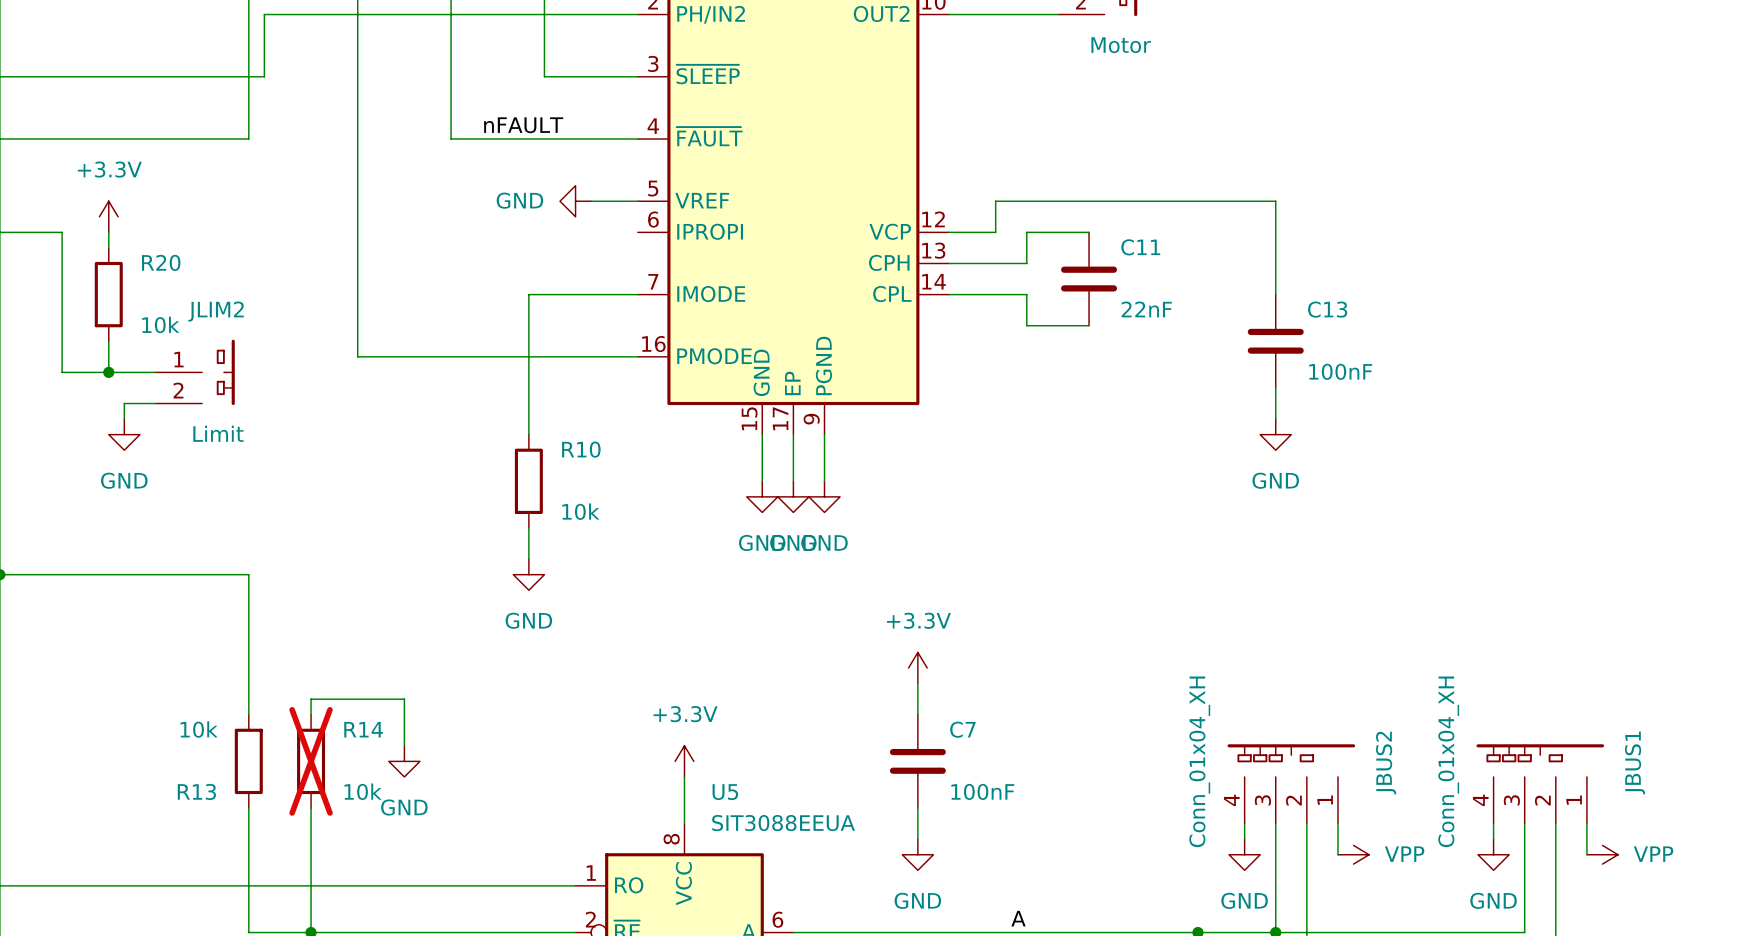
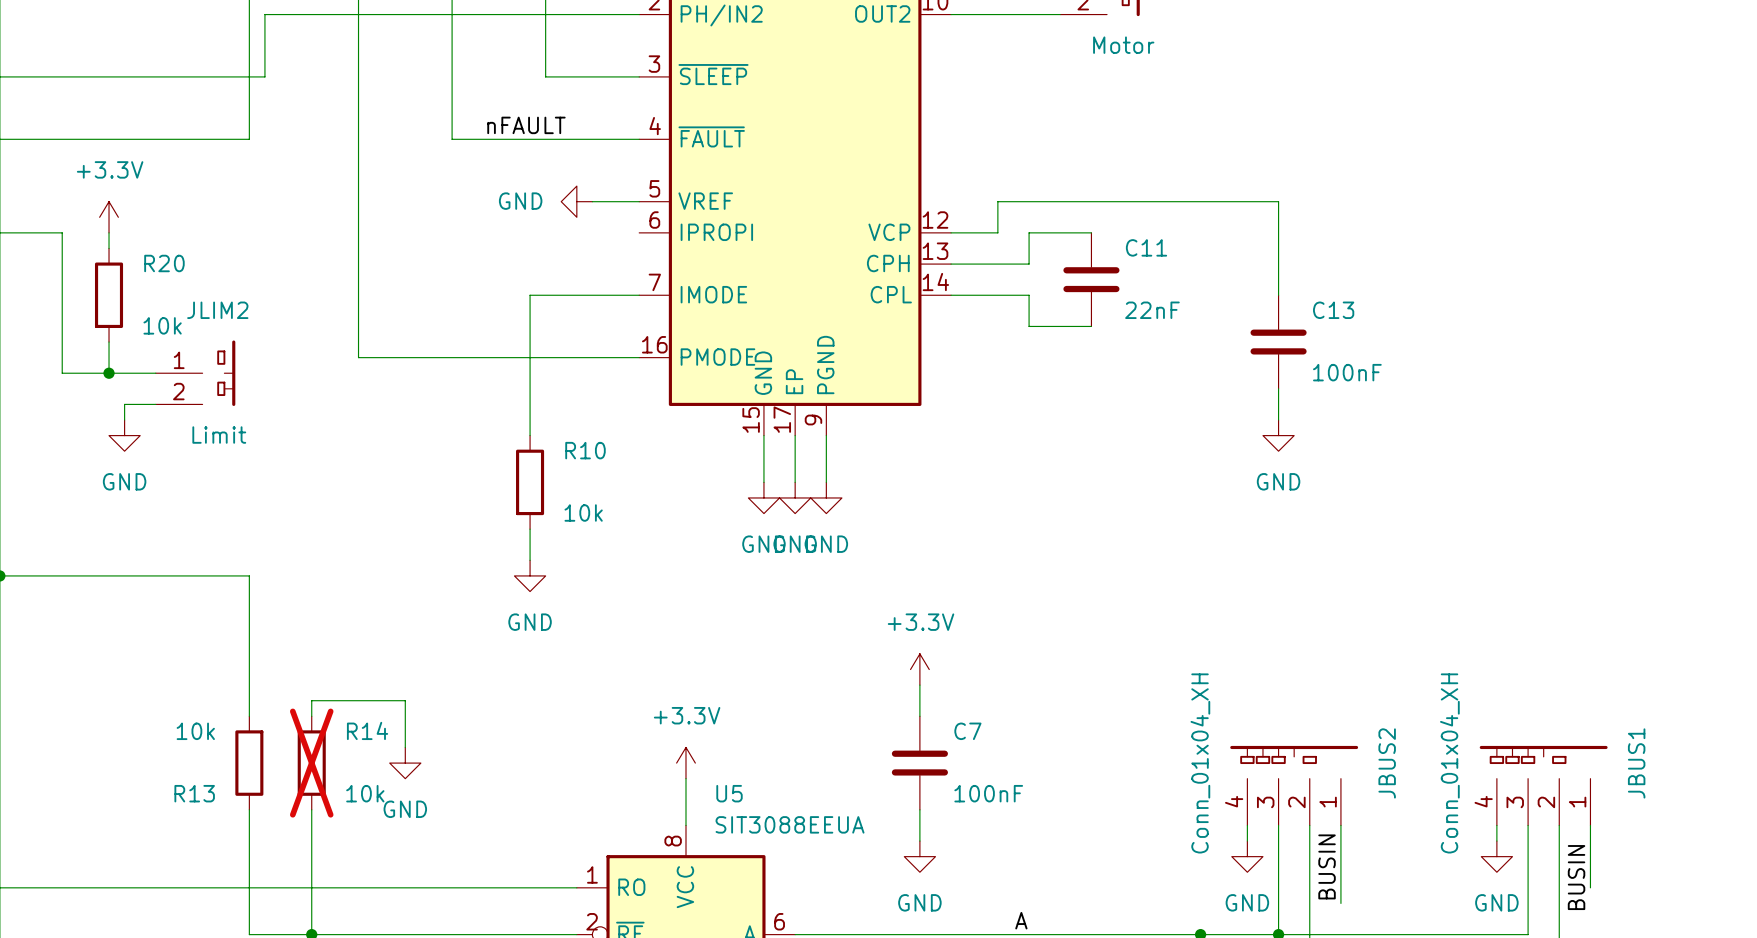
wire: none -> (1340, 856) (1340, 903)
power symbol: VPP (1353, 854) -> none
wire: none -> (1590, 856) (1590, 887)
power symbol: VPP (1602, 854) -> none
label: none -> BUSIN (1327, 866)
label: none -> BUSIN (1576, 877)

